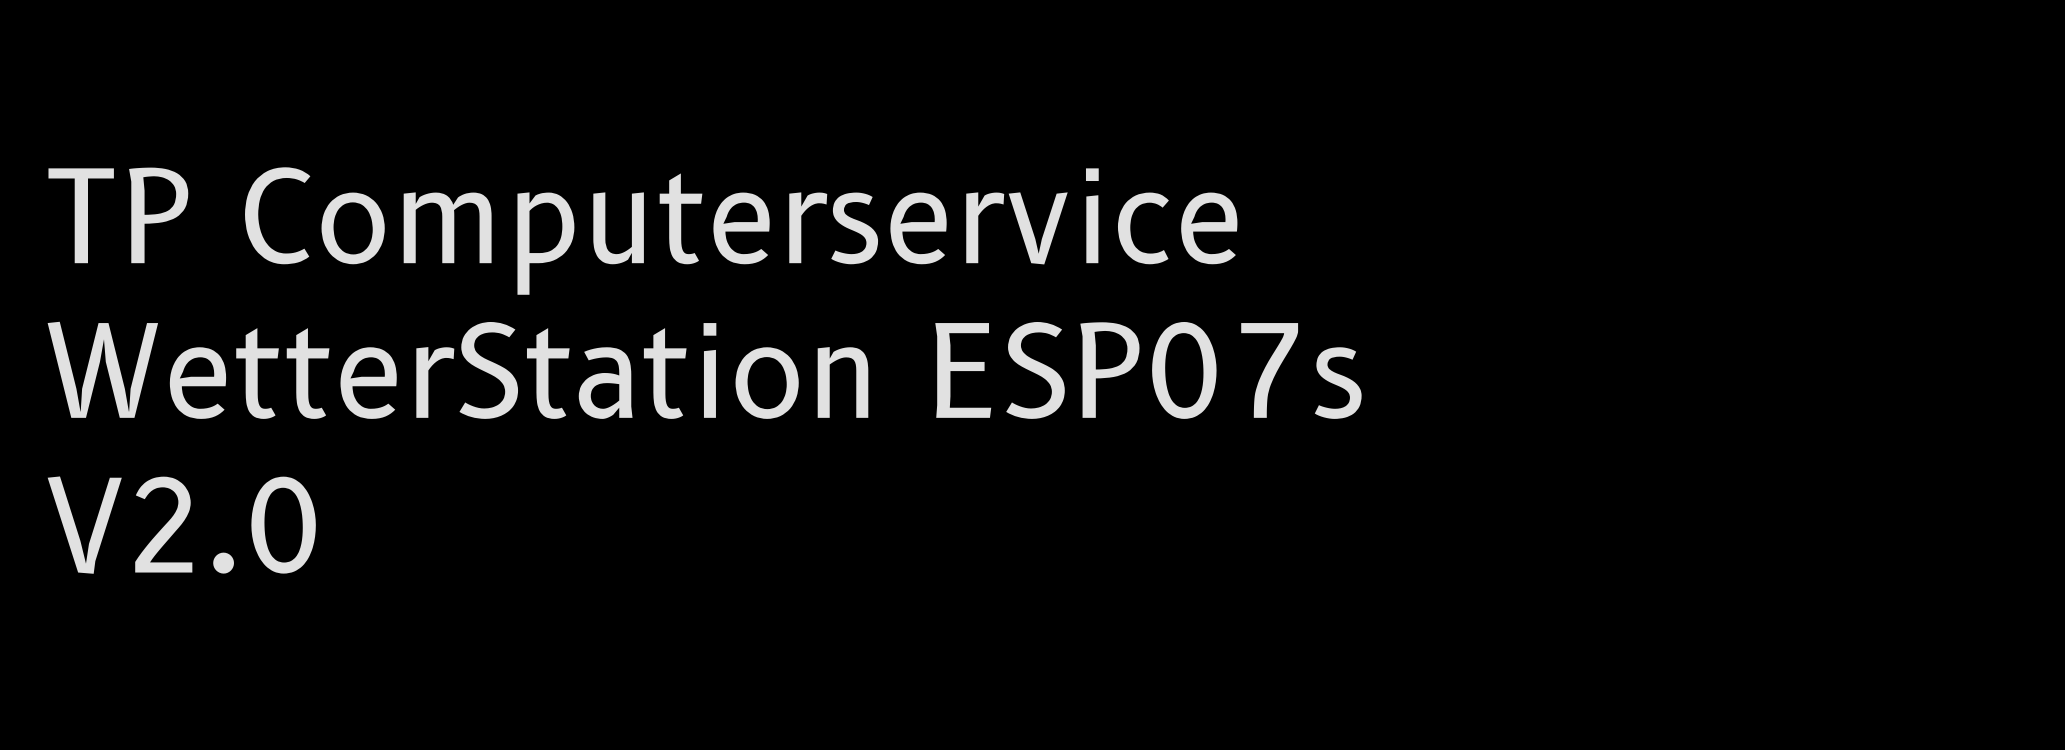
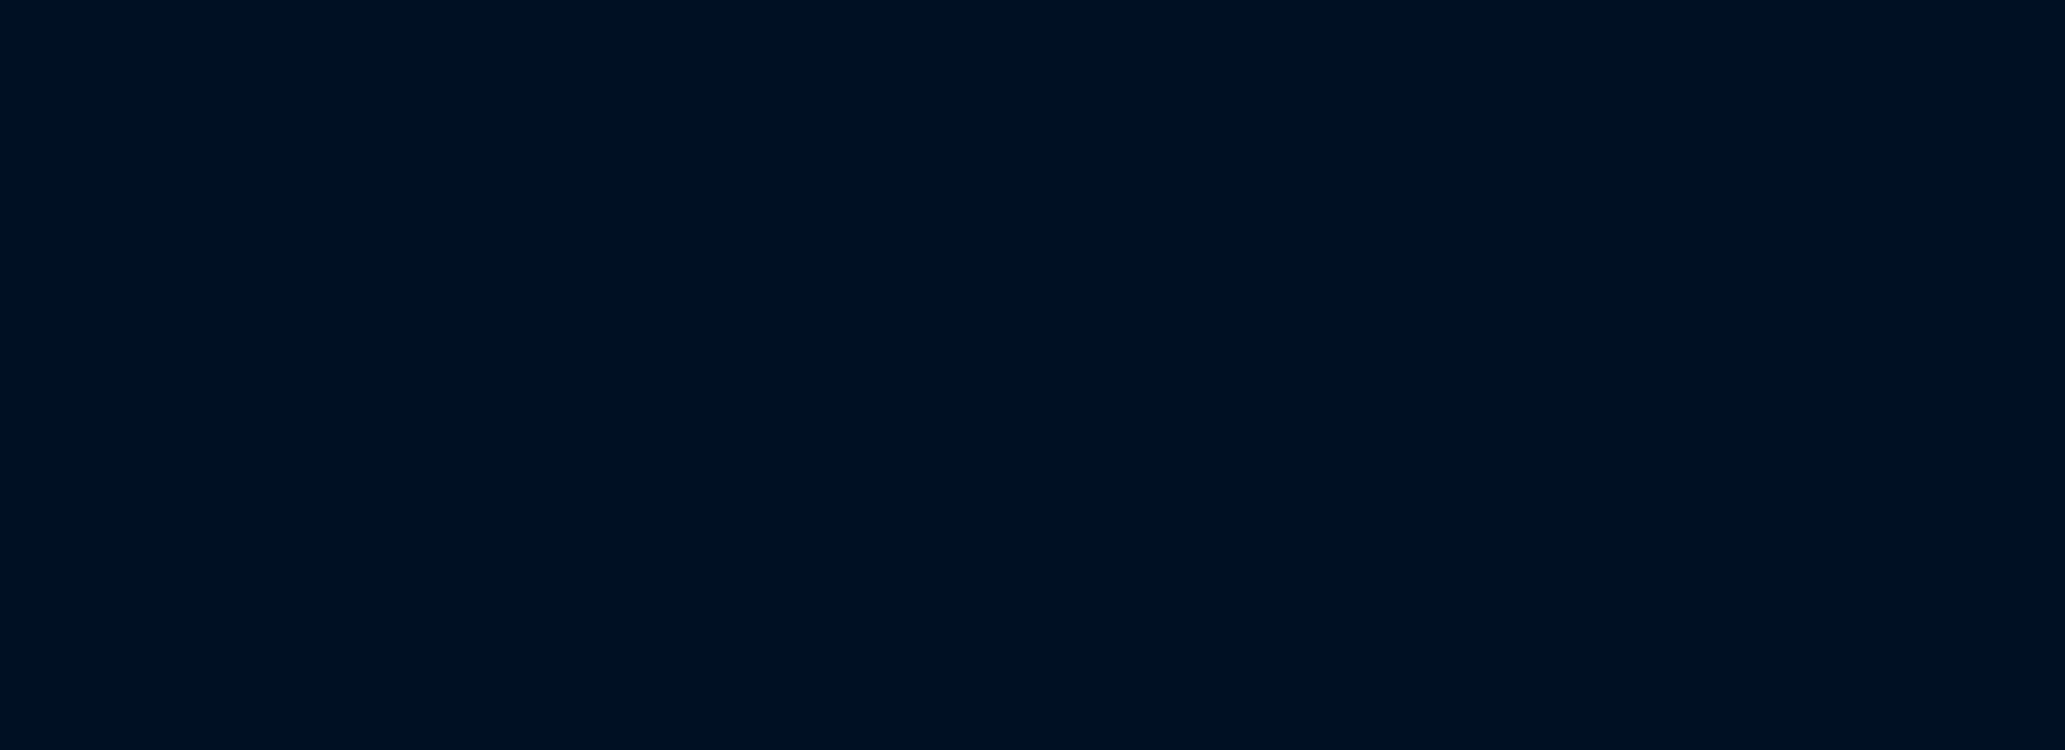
text: TP Computerservice (642, 231) -> none
text: WetterStation ESP07s (704, 370) -> none
text: V2.0 (181, 525) -> none

